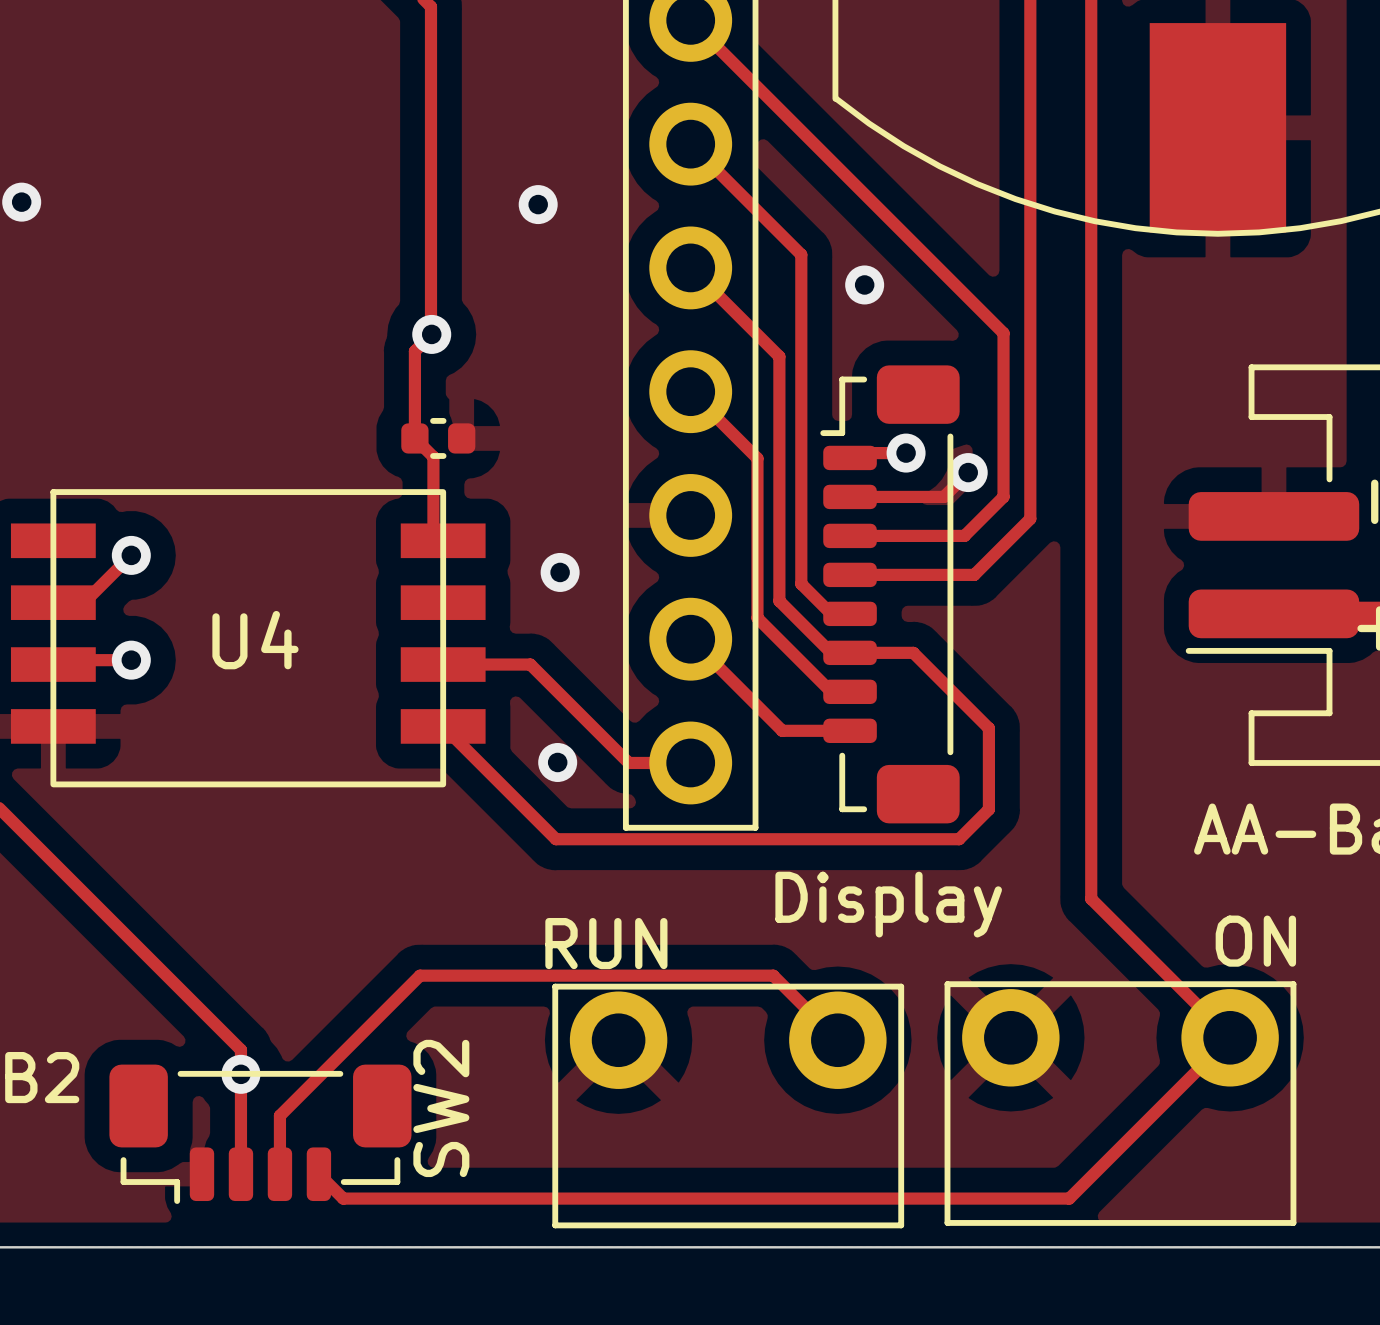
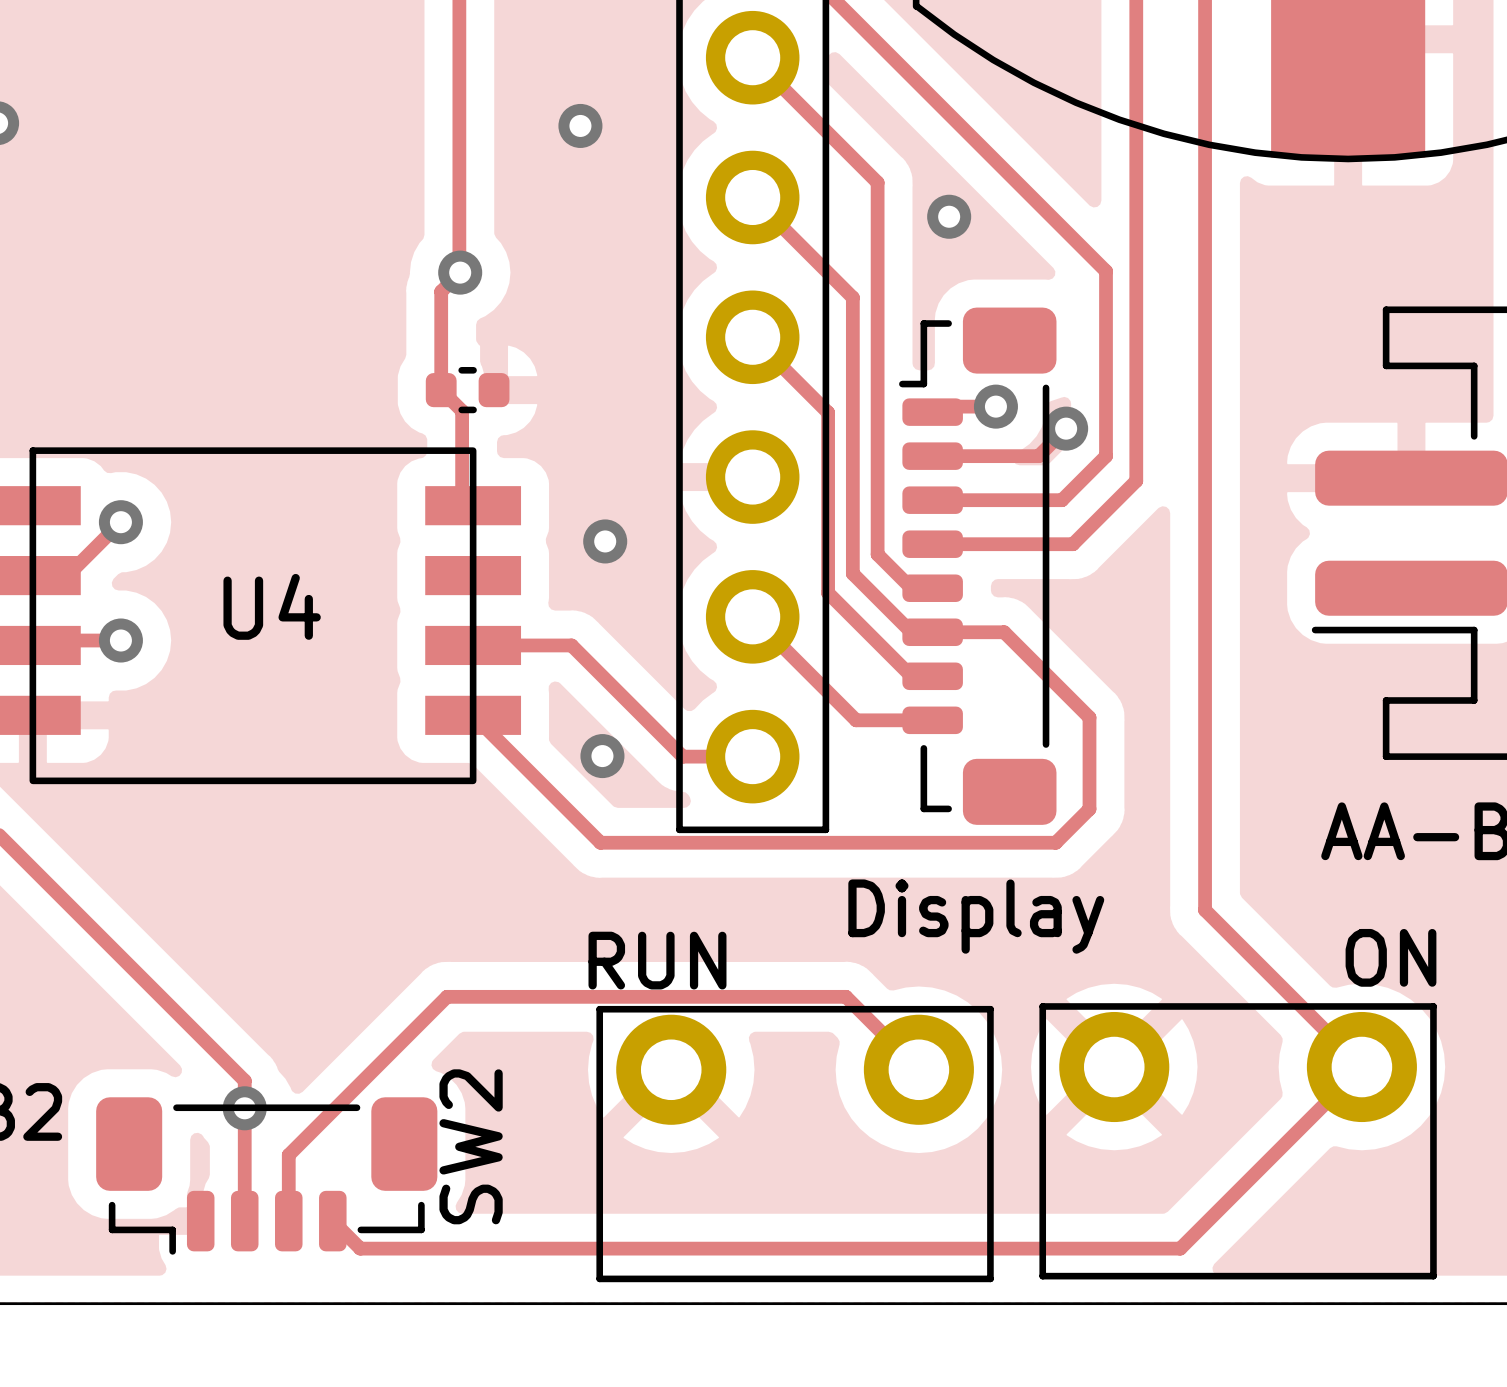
U4 name position: U4 (255, 640) -> U4 (272, 606)

